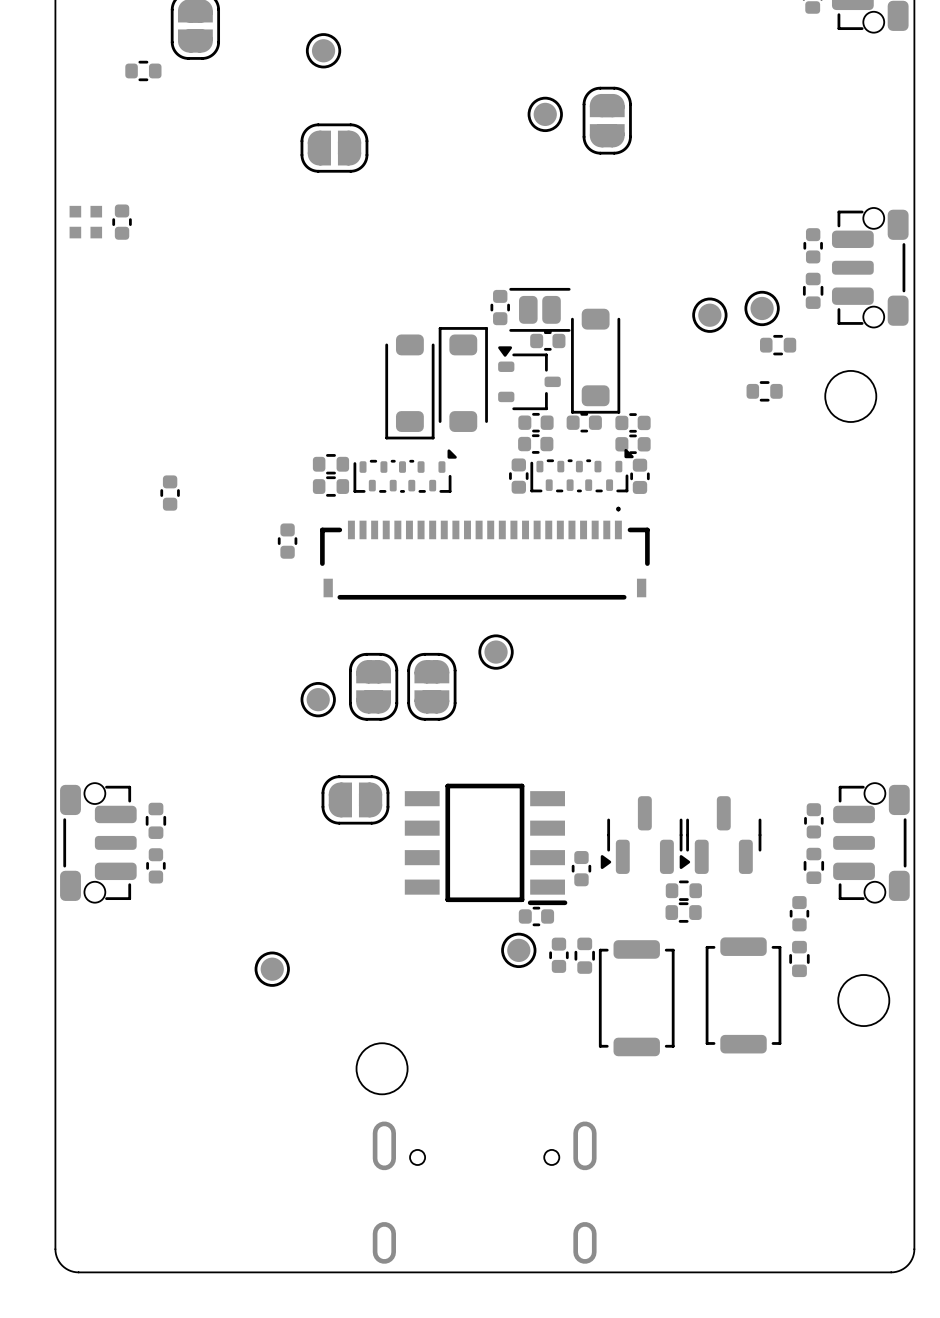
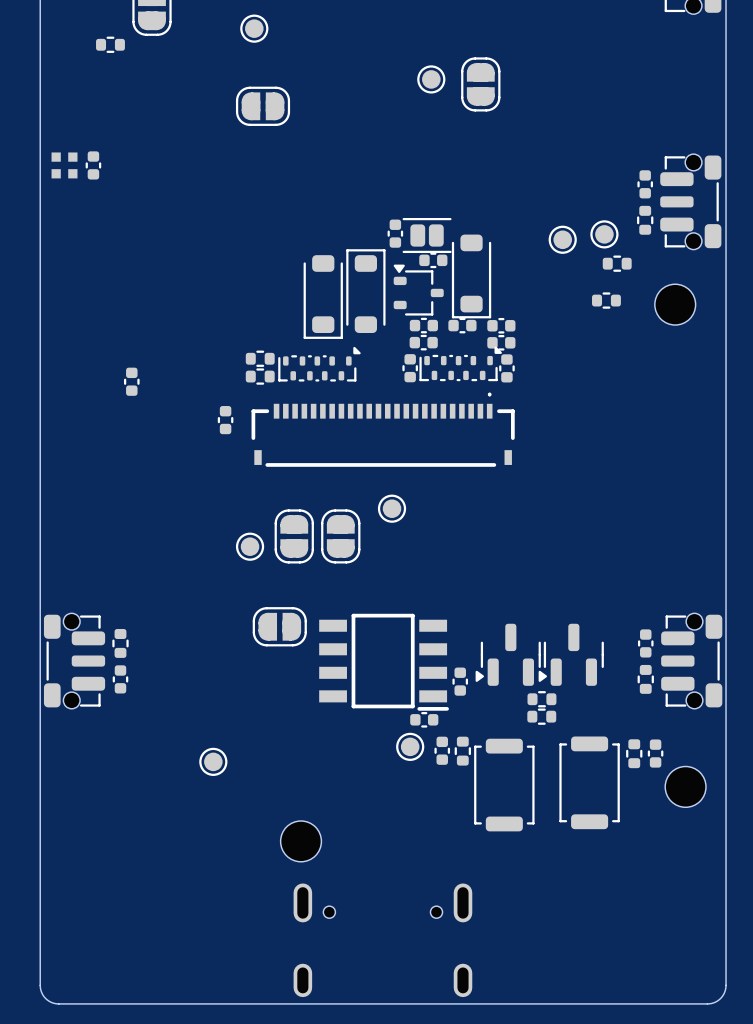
part position: (799, 913) -> (655, 753)

